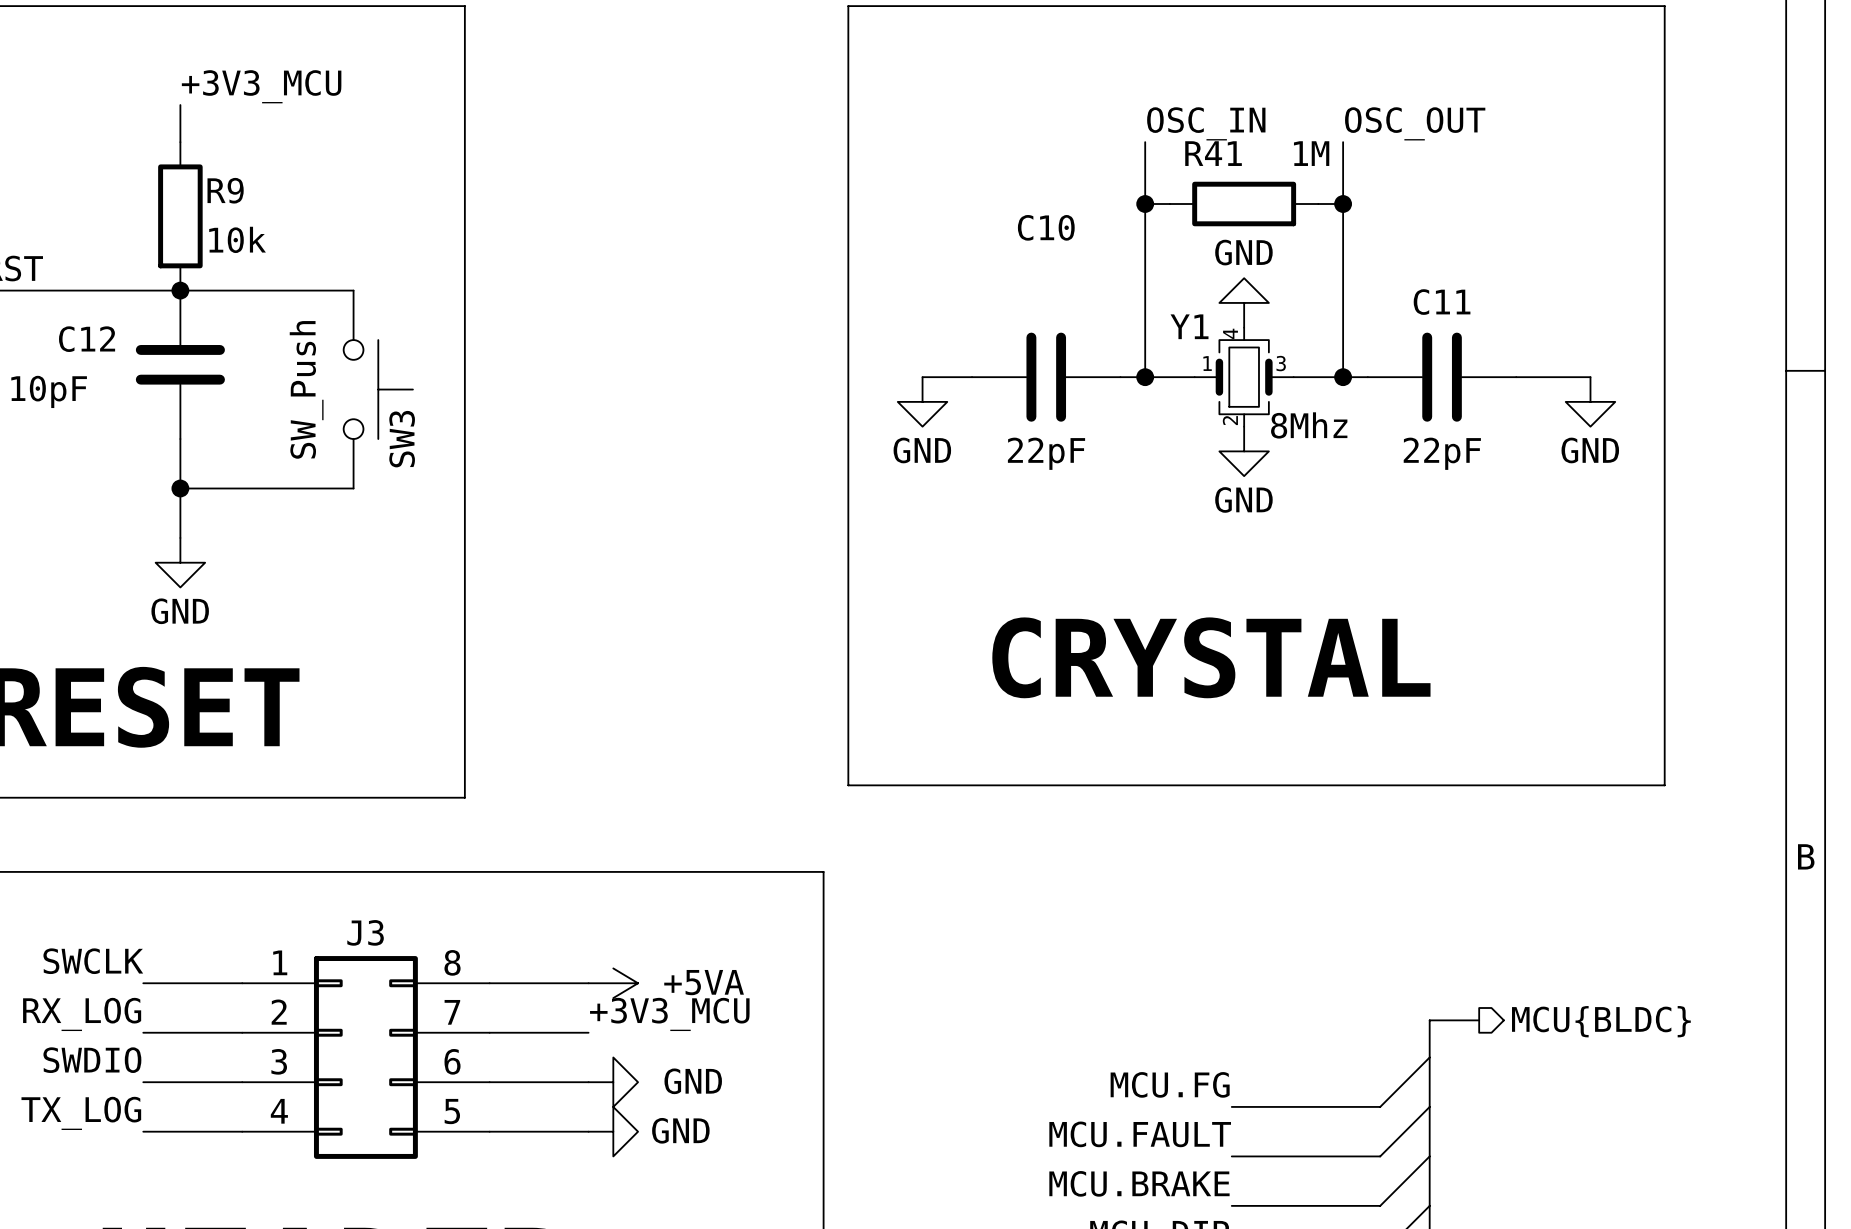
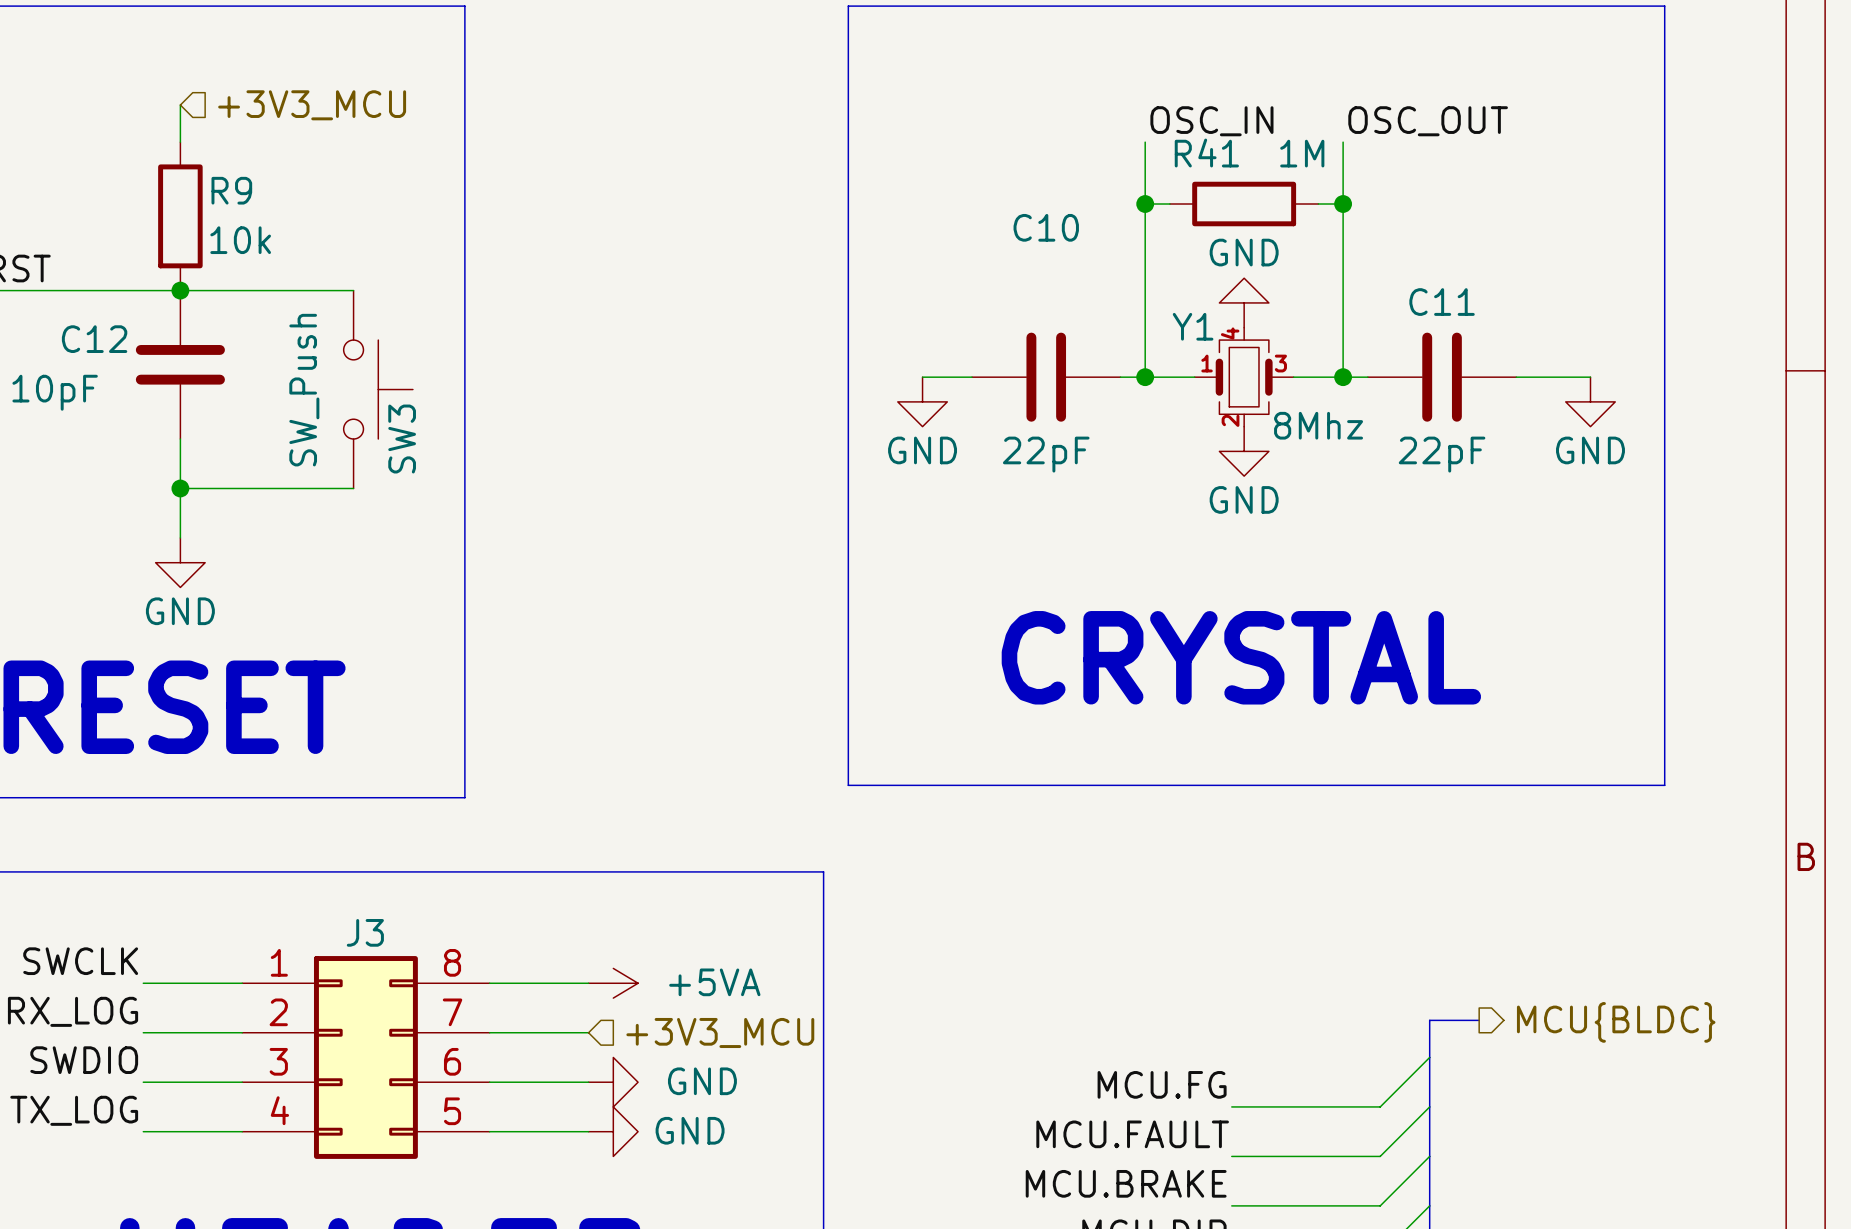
label: +3V3_MCU (261, 86) -> none
hierarchical label: none -> +3V3_MCU (312, 105)
label: +3V3_MCU (669, 1014) -> none
hierarchical label: none -> +3V3_MCU (720, 1032)

